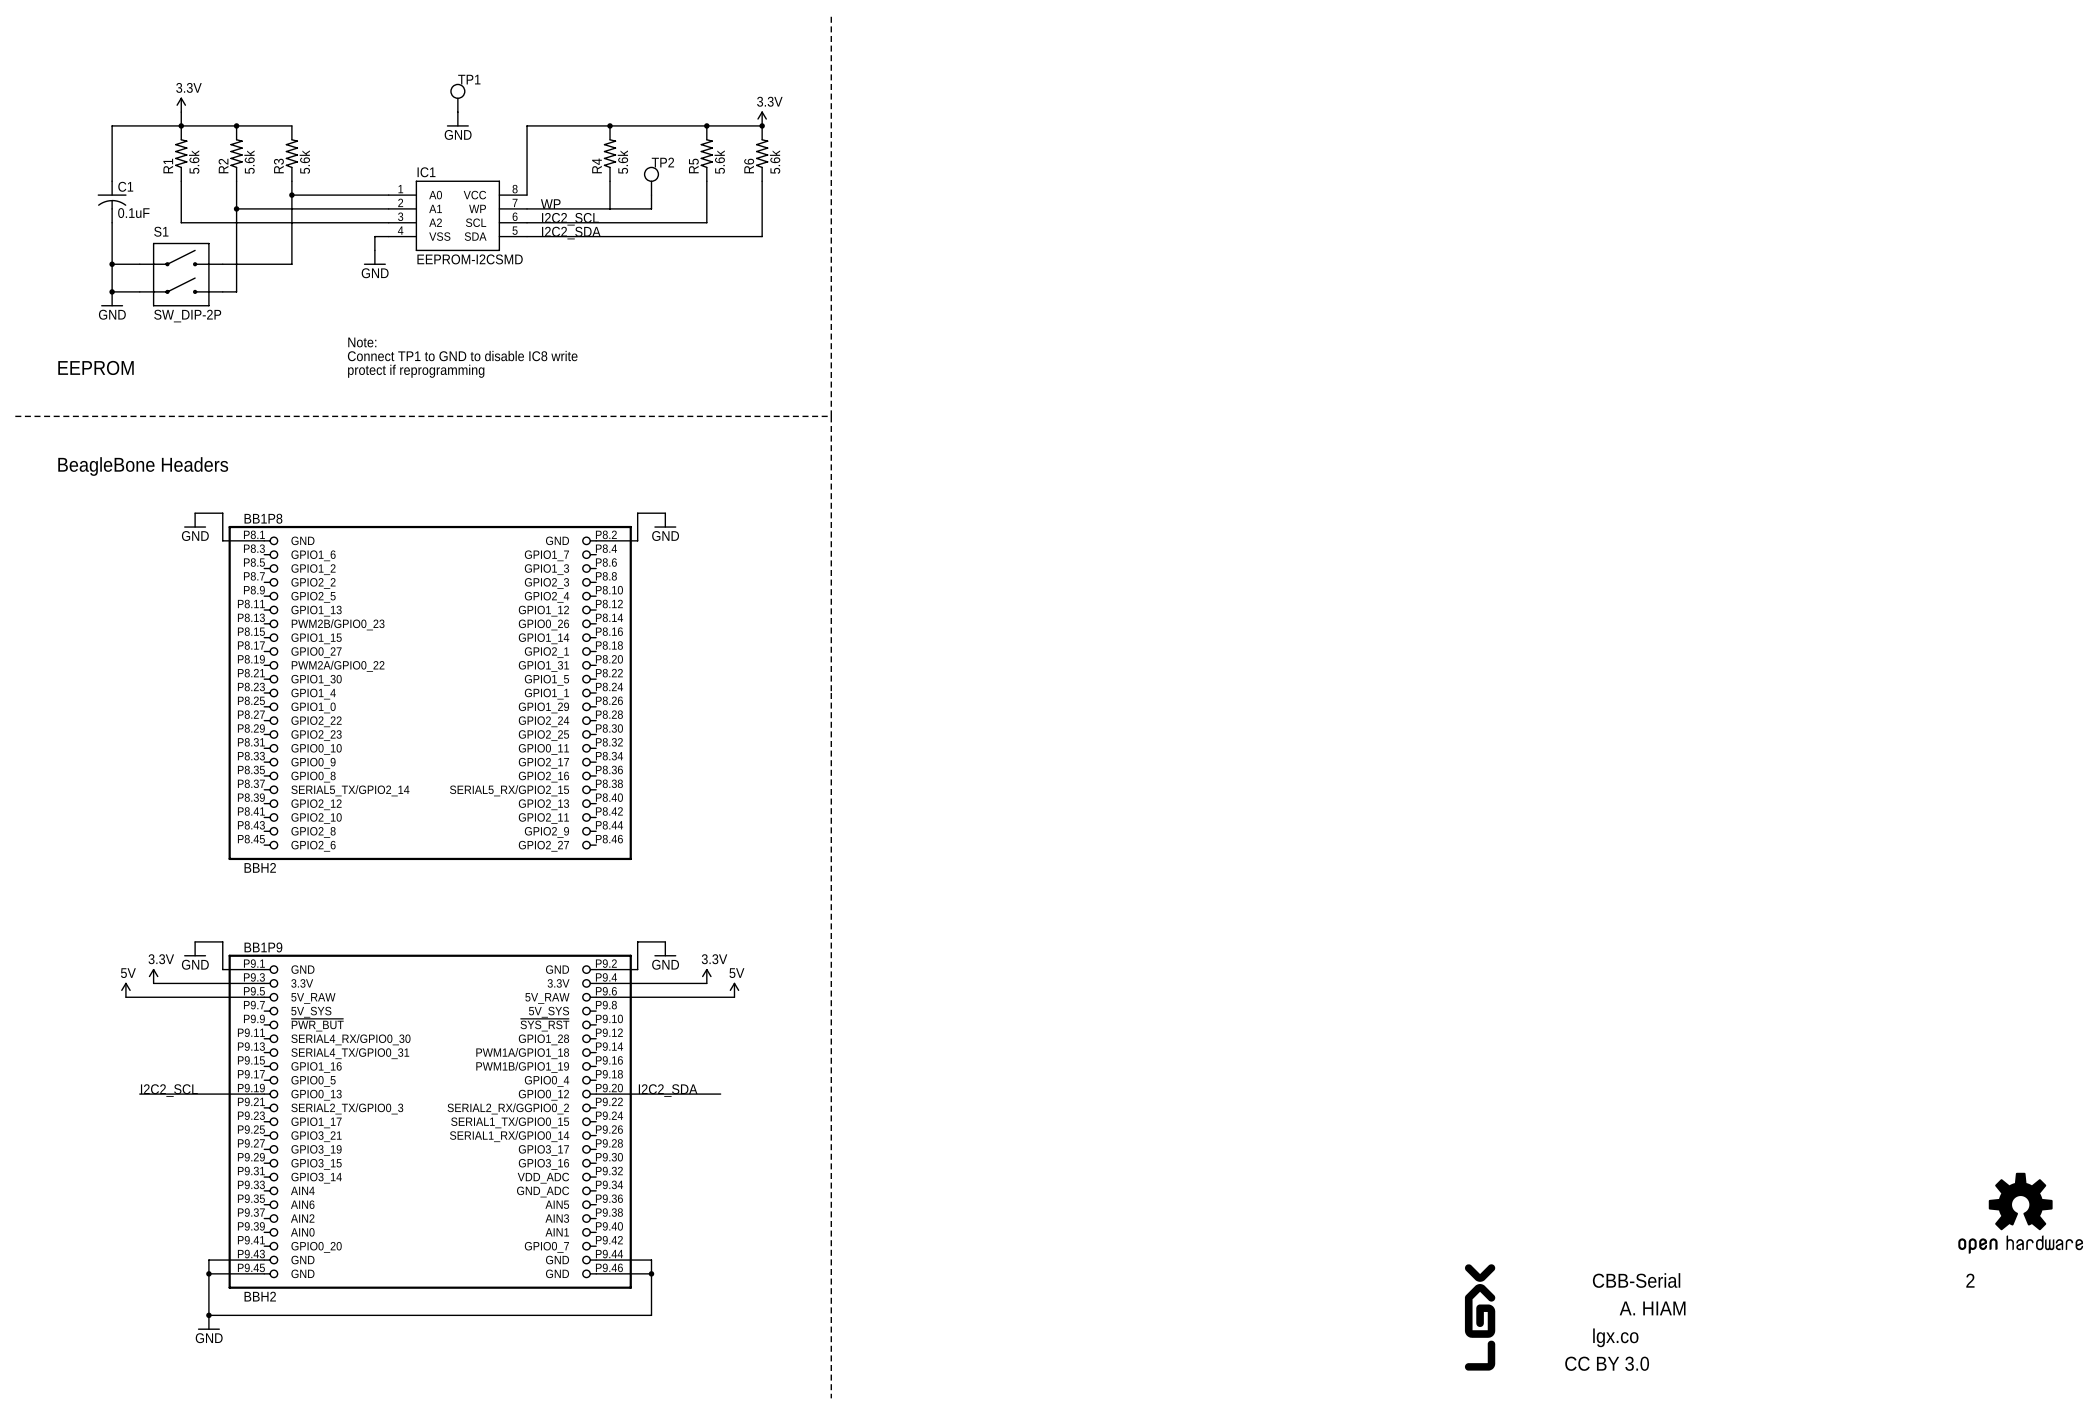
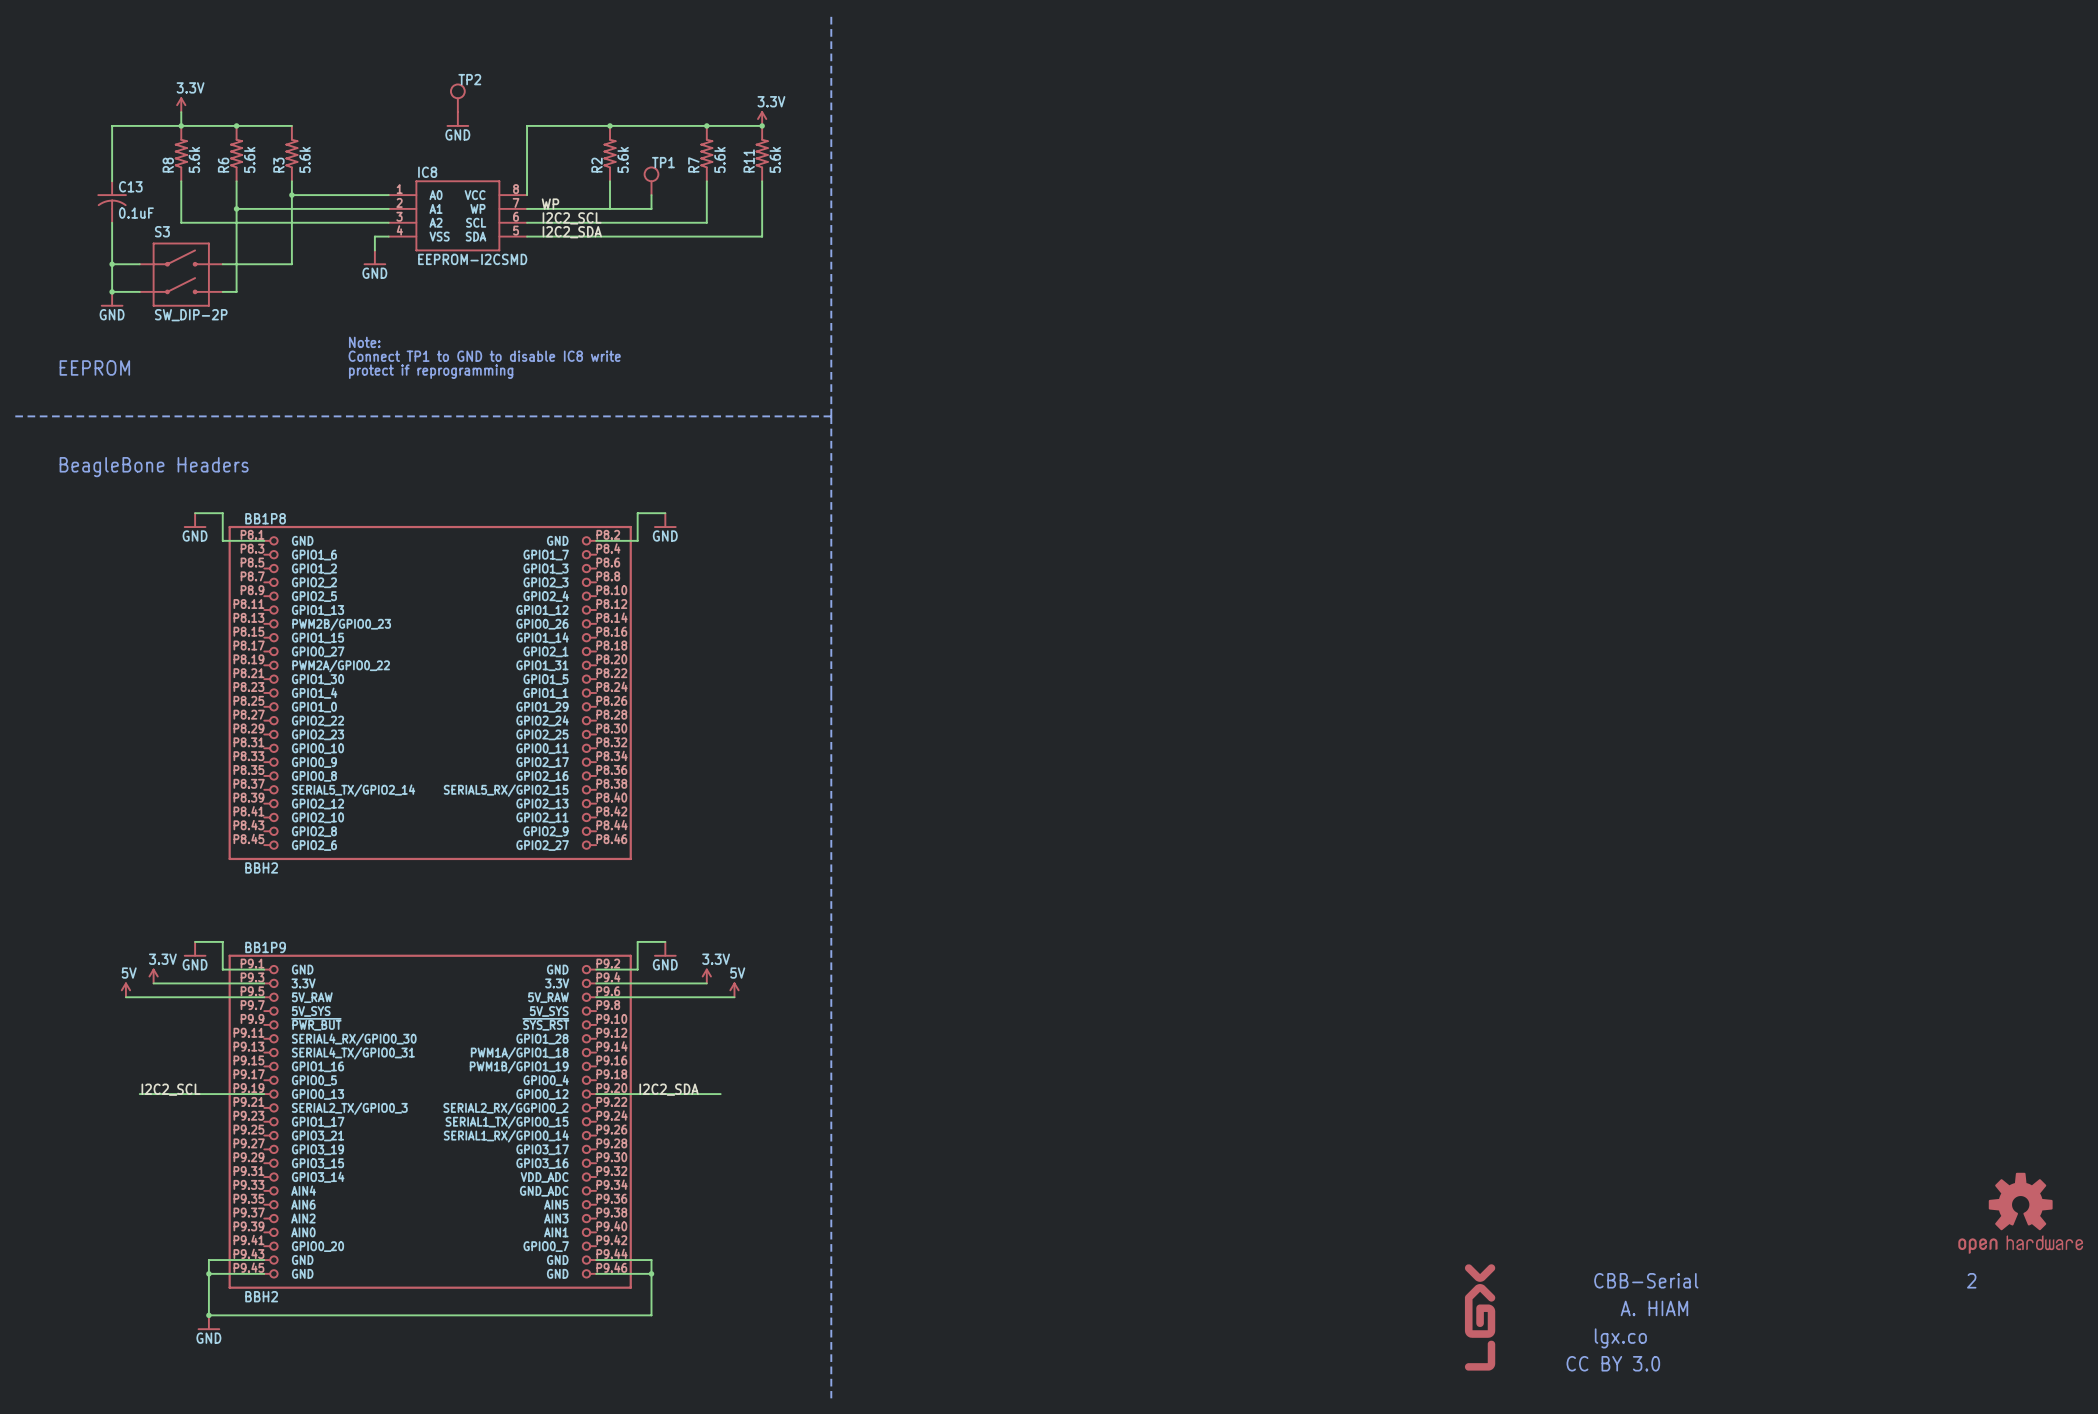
TP1 name: TP1 (469, 79) -> TP2 (469, 79)
TP2 name: TP2 (662, 162) -> TP1 (663, 162)
R4 name: R4 (597, 165) -> R2 (597, 165)
R1 name: R1 (168, 166) -> R8 (168, 165)
R2 name: R2 (223, 166) -> R6 (223, 165)
R5 name: R5 (693, 166) -> R7 (693, 164)
R6 name: R6 (749, 166) -> R11 (749, 160)
IC1 name: IC1 (426, 172) -> IC8 (427, 172)
C1 name: C1 (125, 186) -> C13 (130, 186)
S1 name: S1 (161, 231) -> S3 (162, 231)

